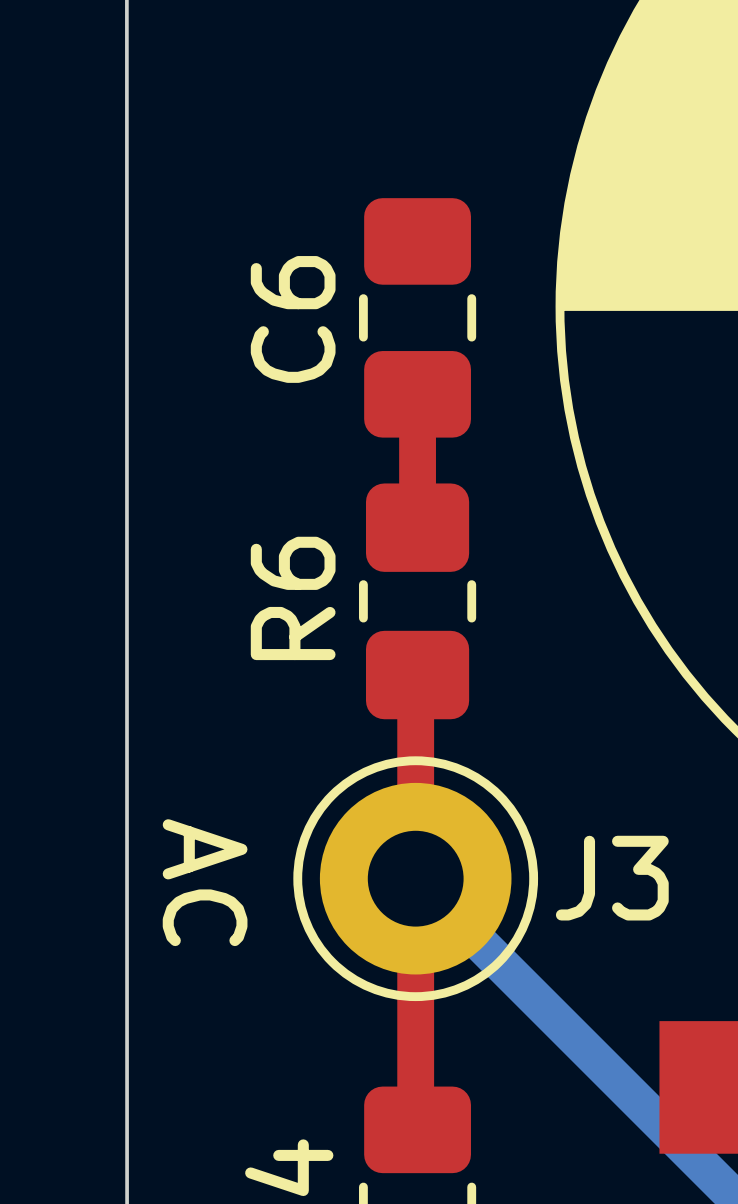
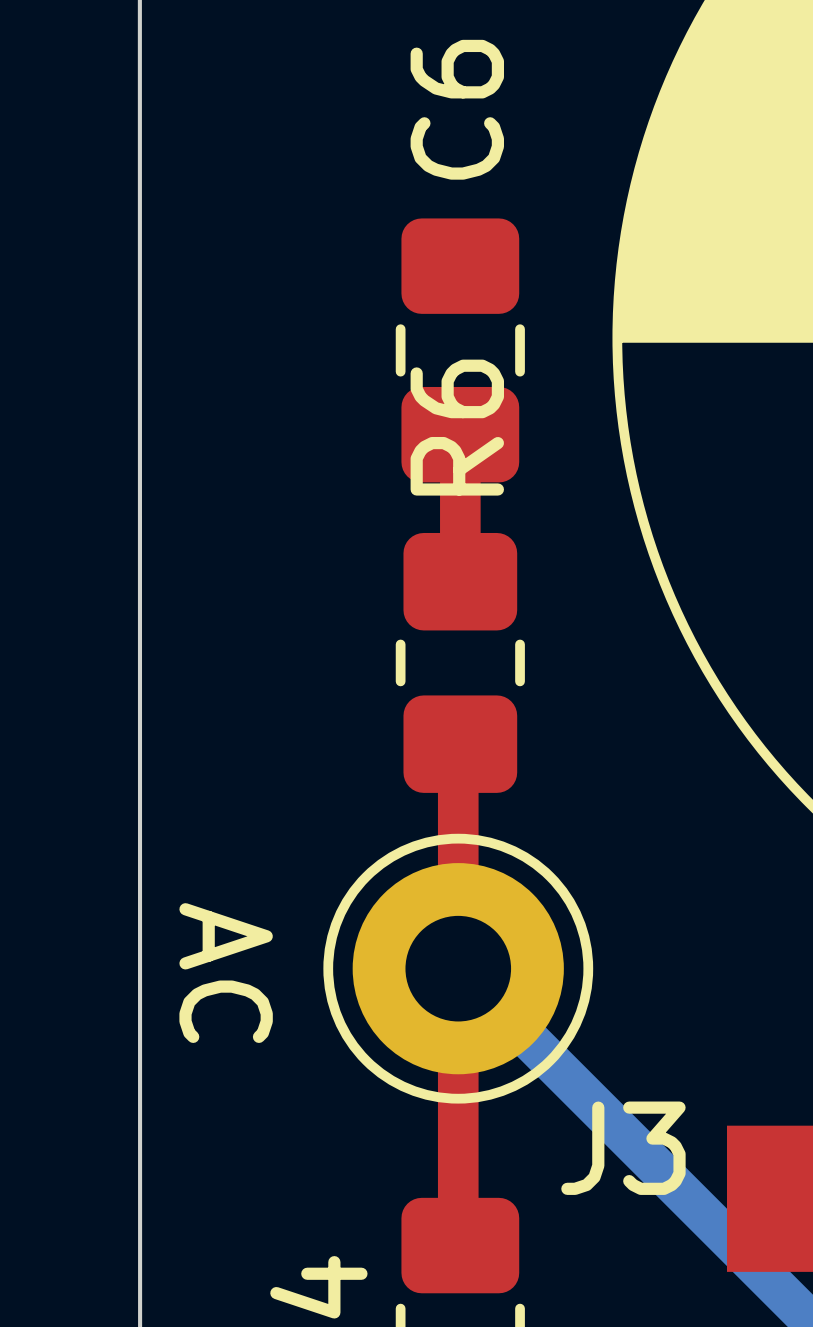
C6 name position: C6 (293, 319) -> C6 (457, 109)
R6 name position: R6 (293, 598) -> R6 (457, 427)
J3 name position: J3 (612, 878) -> J3 (623, 1148)

